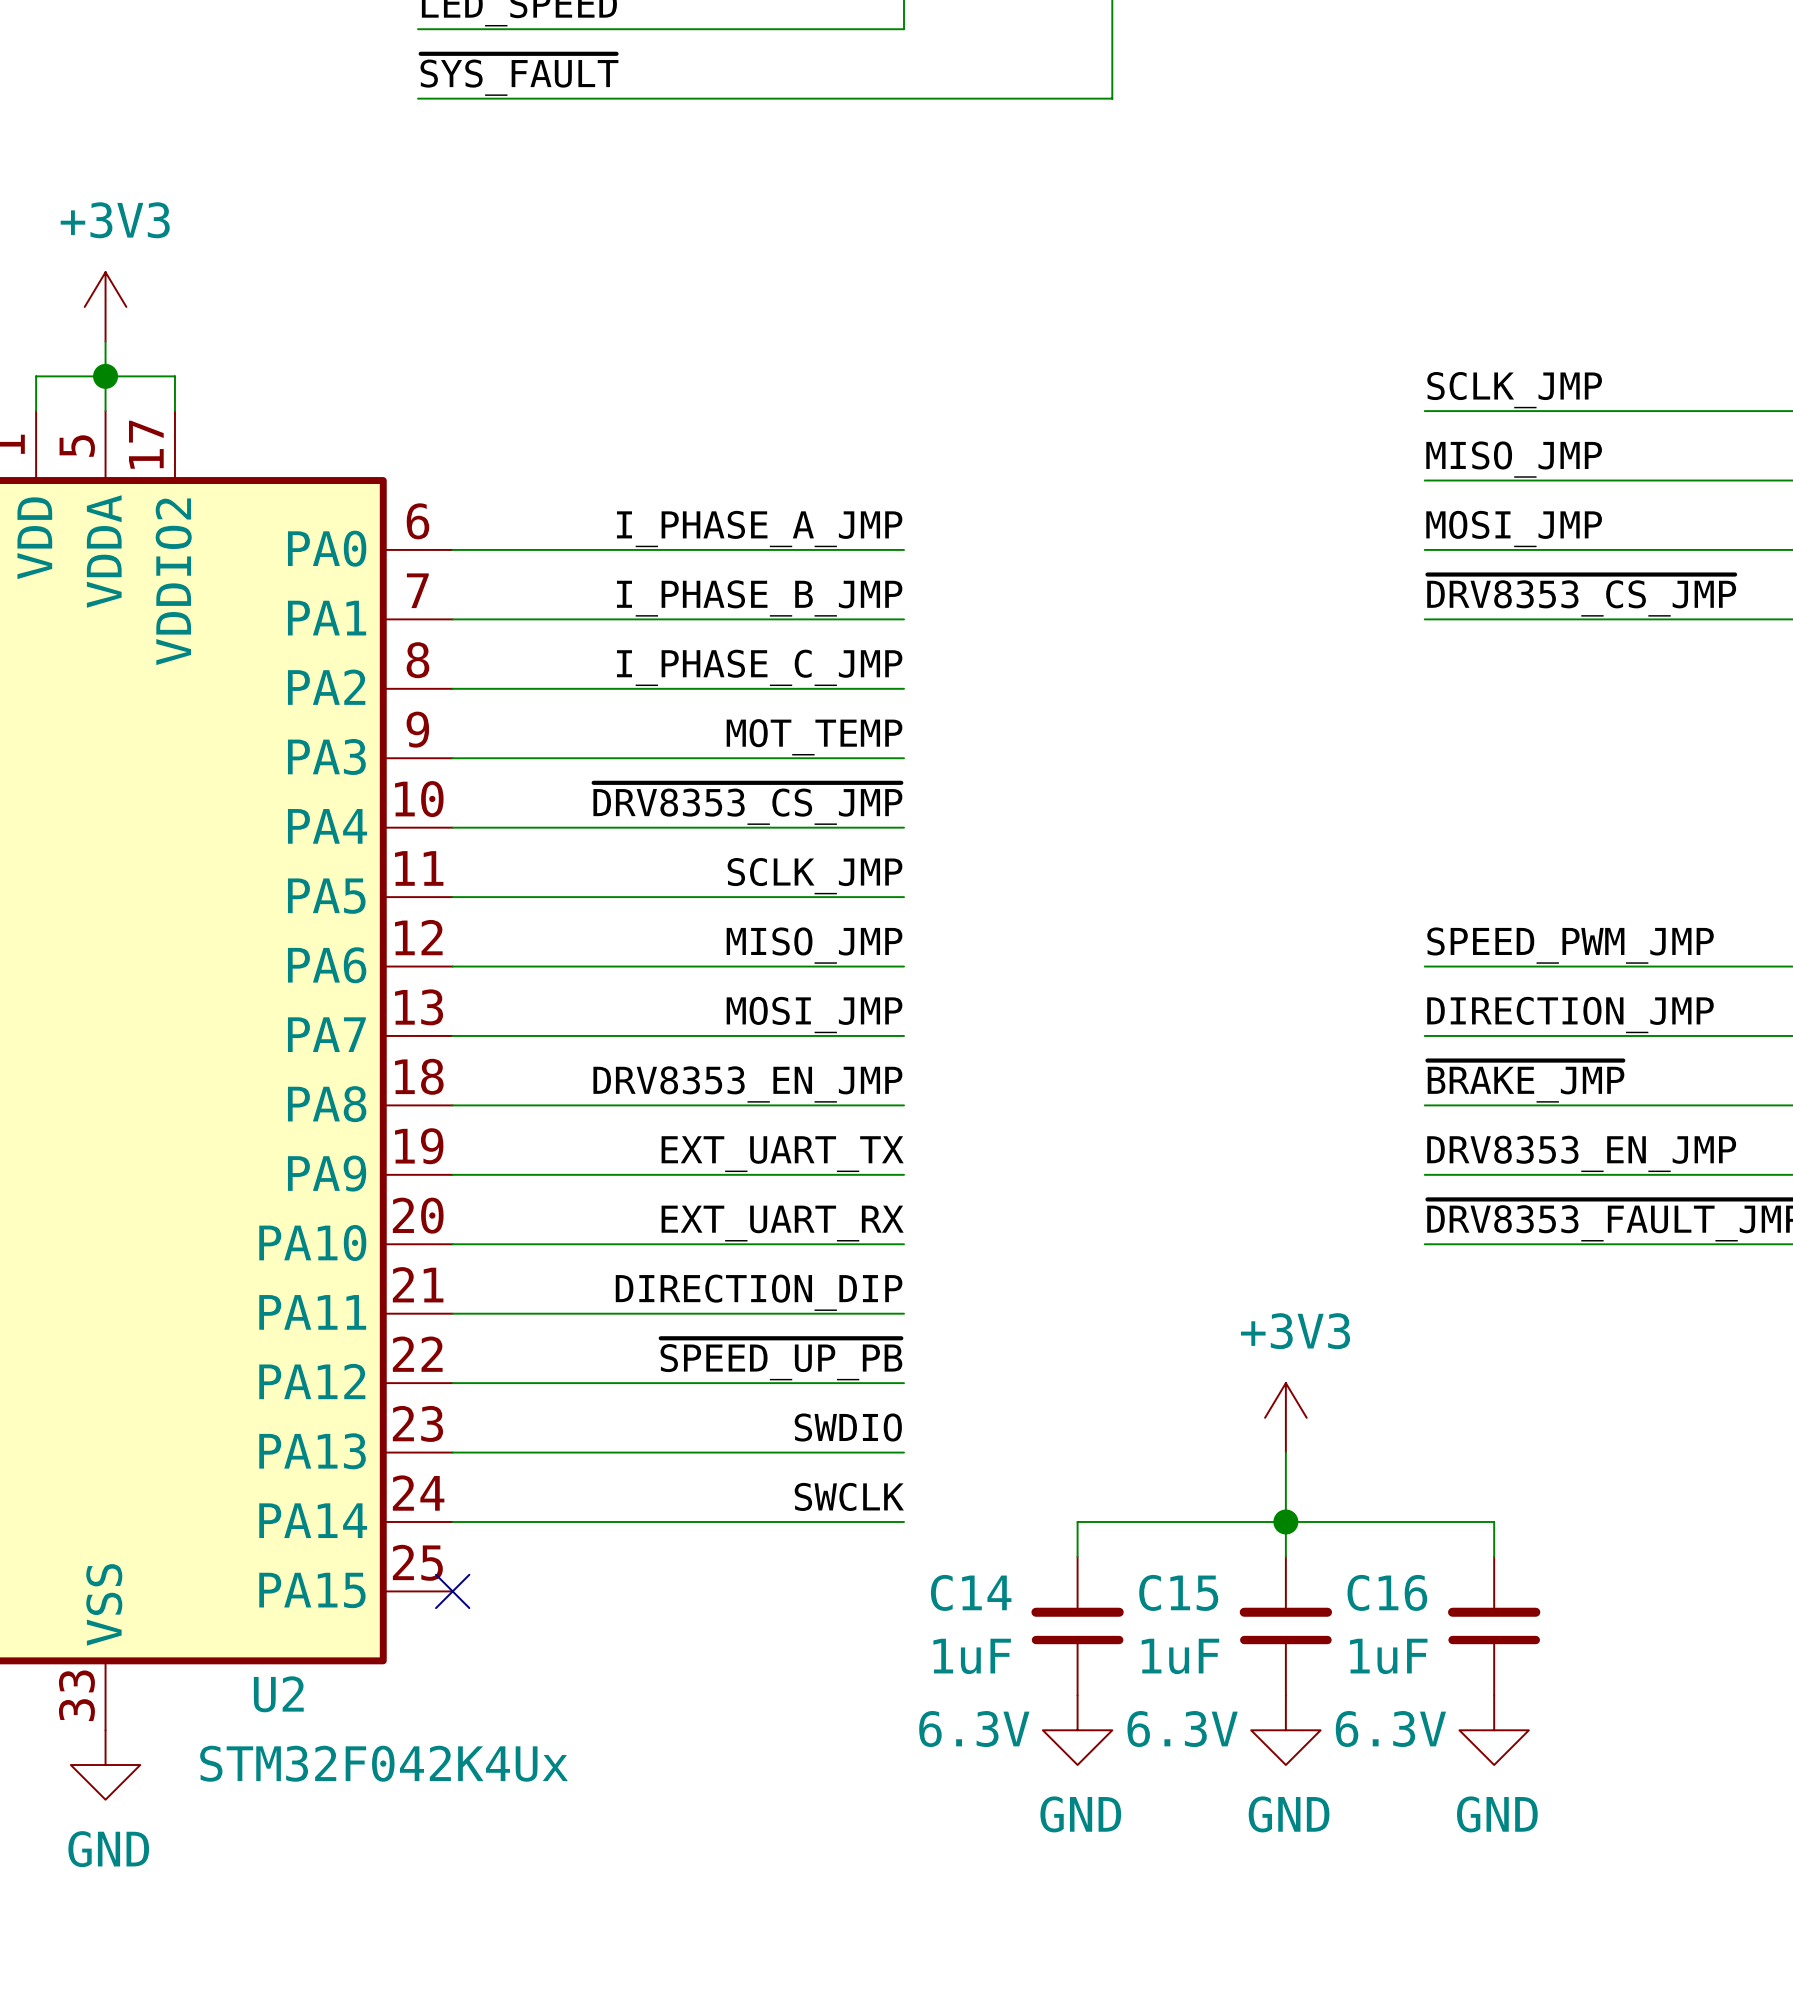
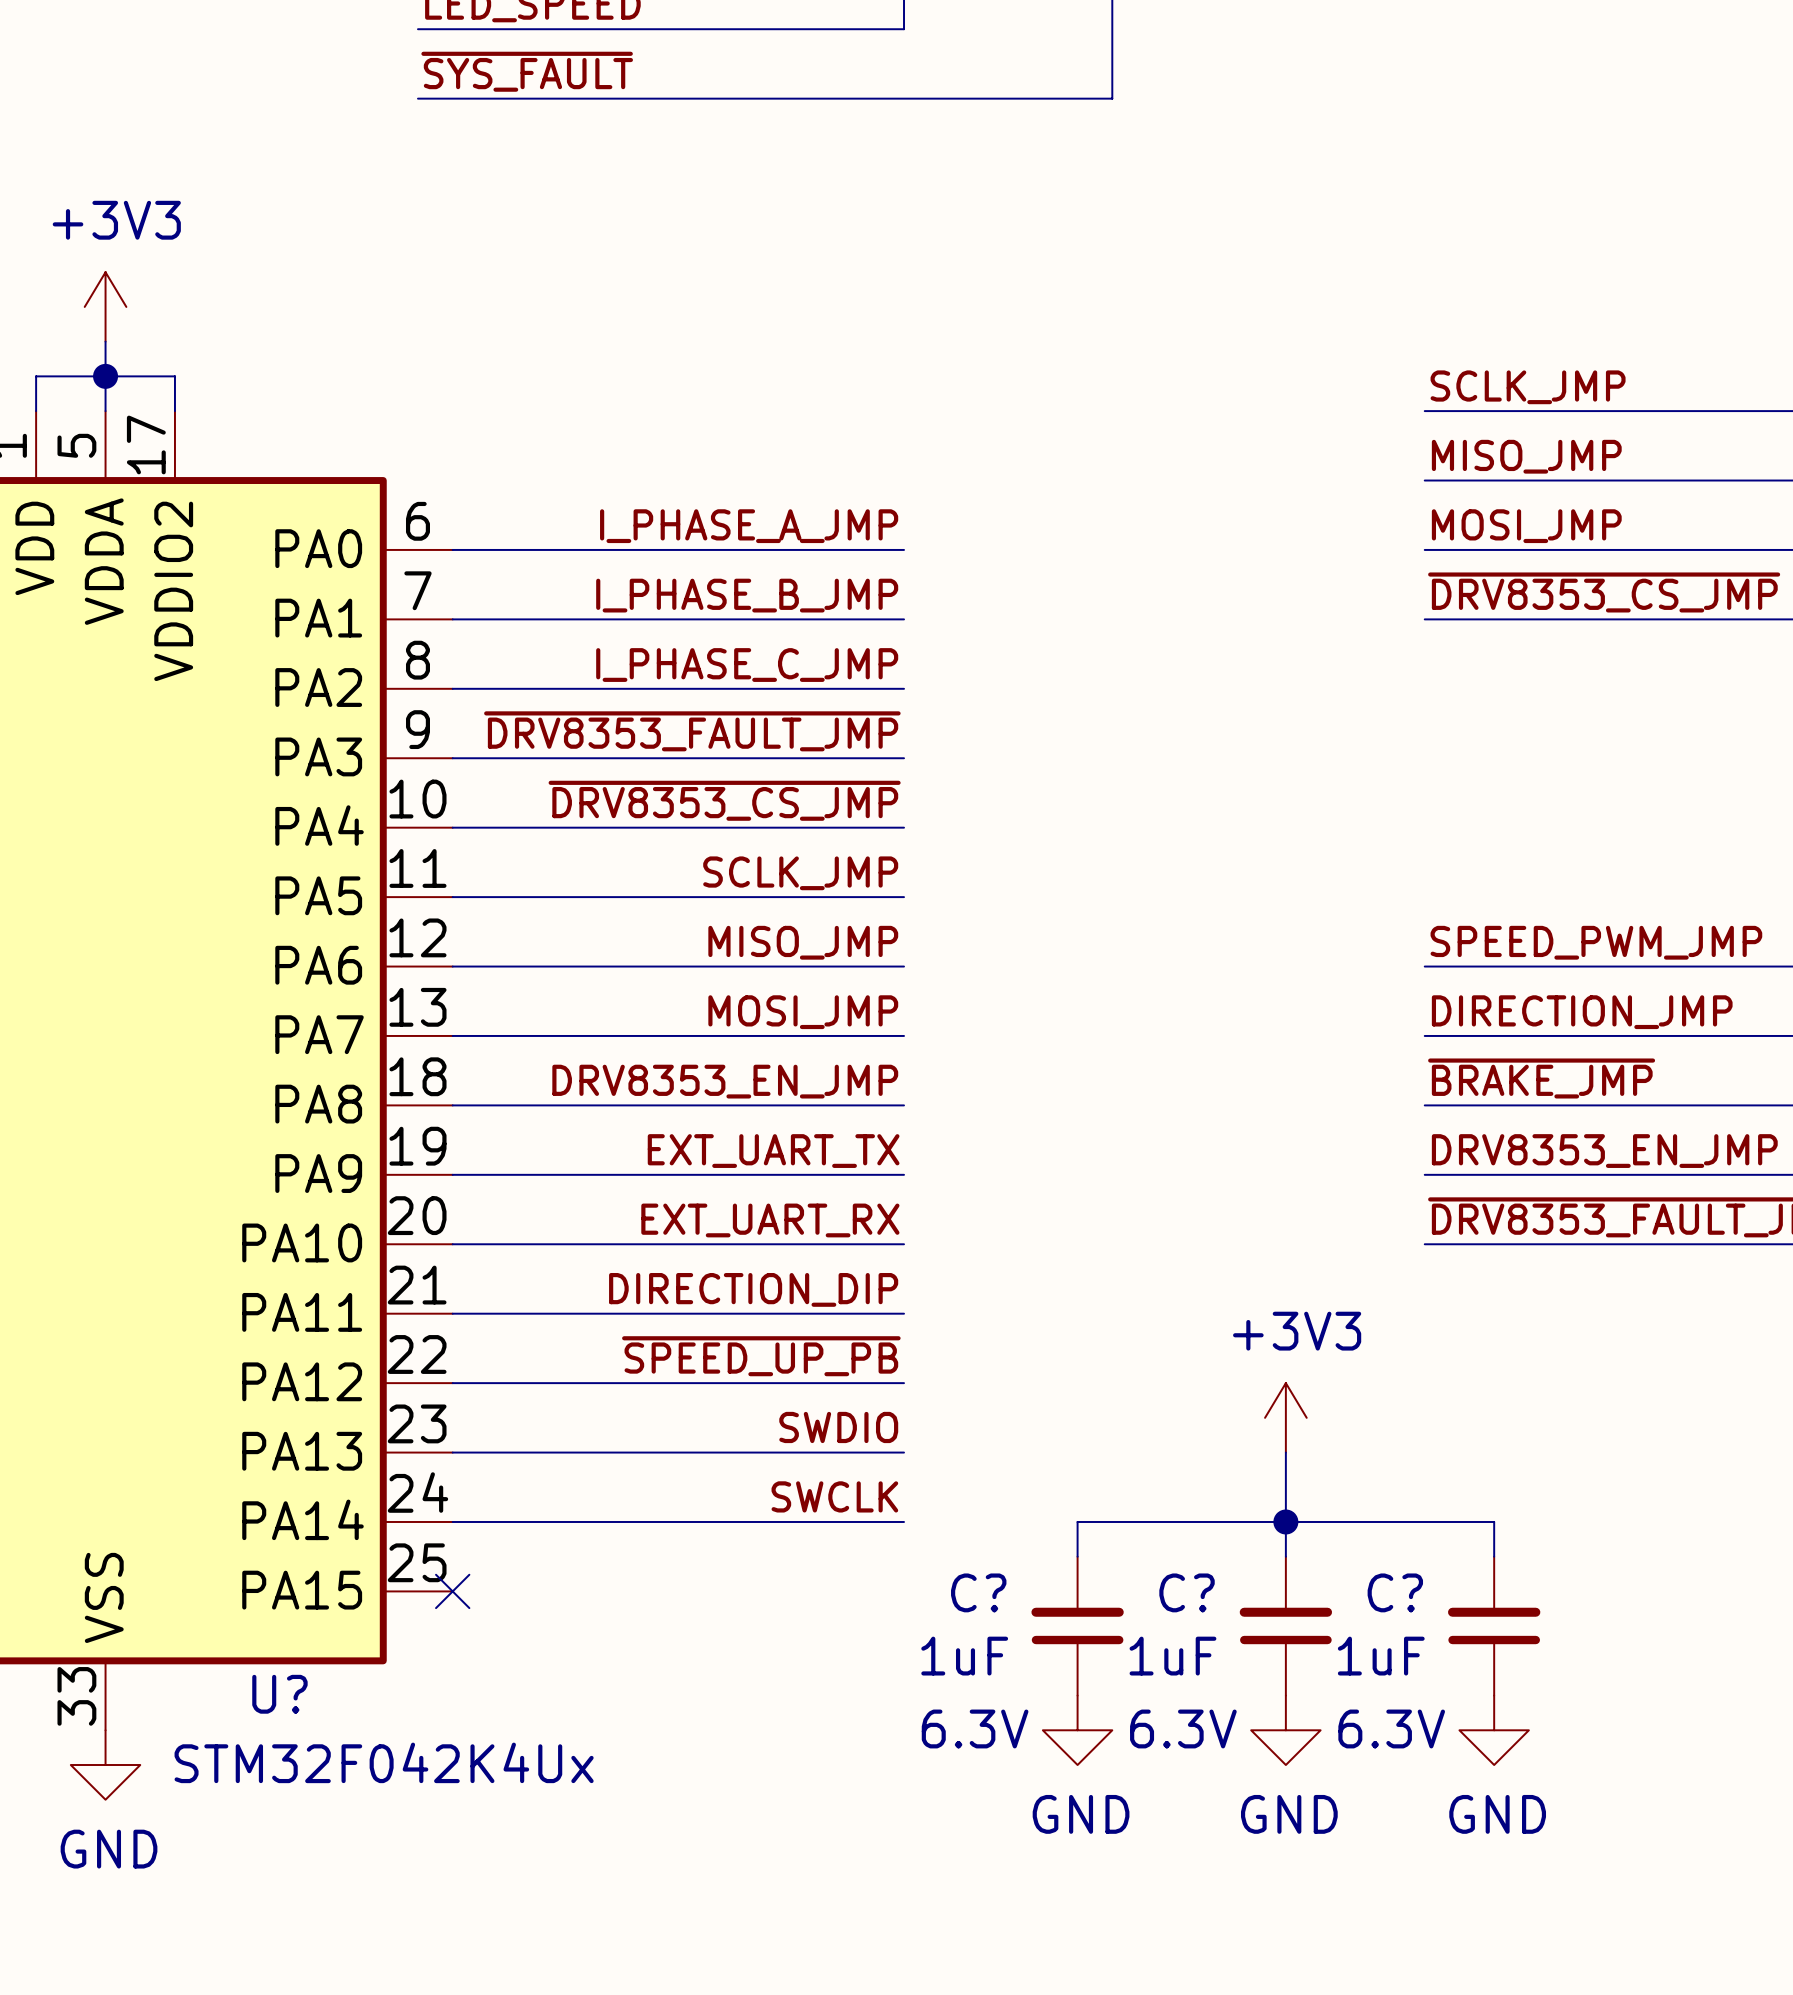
label: MOT_TEMP (814, 737) -> ~{DRV8353_FAULT_JMP} (692, 731)
C14 name: C14 (971, 1592) -> C? (978, 1592)
C15 name: C15 (1178, 1592) -> C? (1187, 1592)
C16 name: C16 (1387, 1592) -> C? (1395, 1592)
U2 name: U2 (278, 1694) -> U? (279, 1694)

